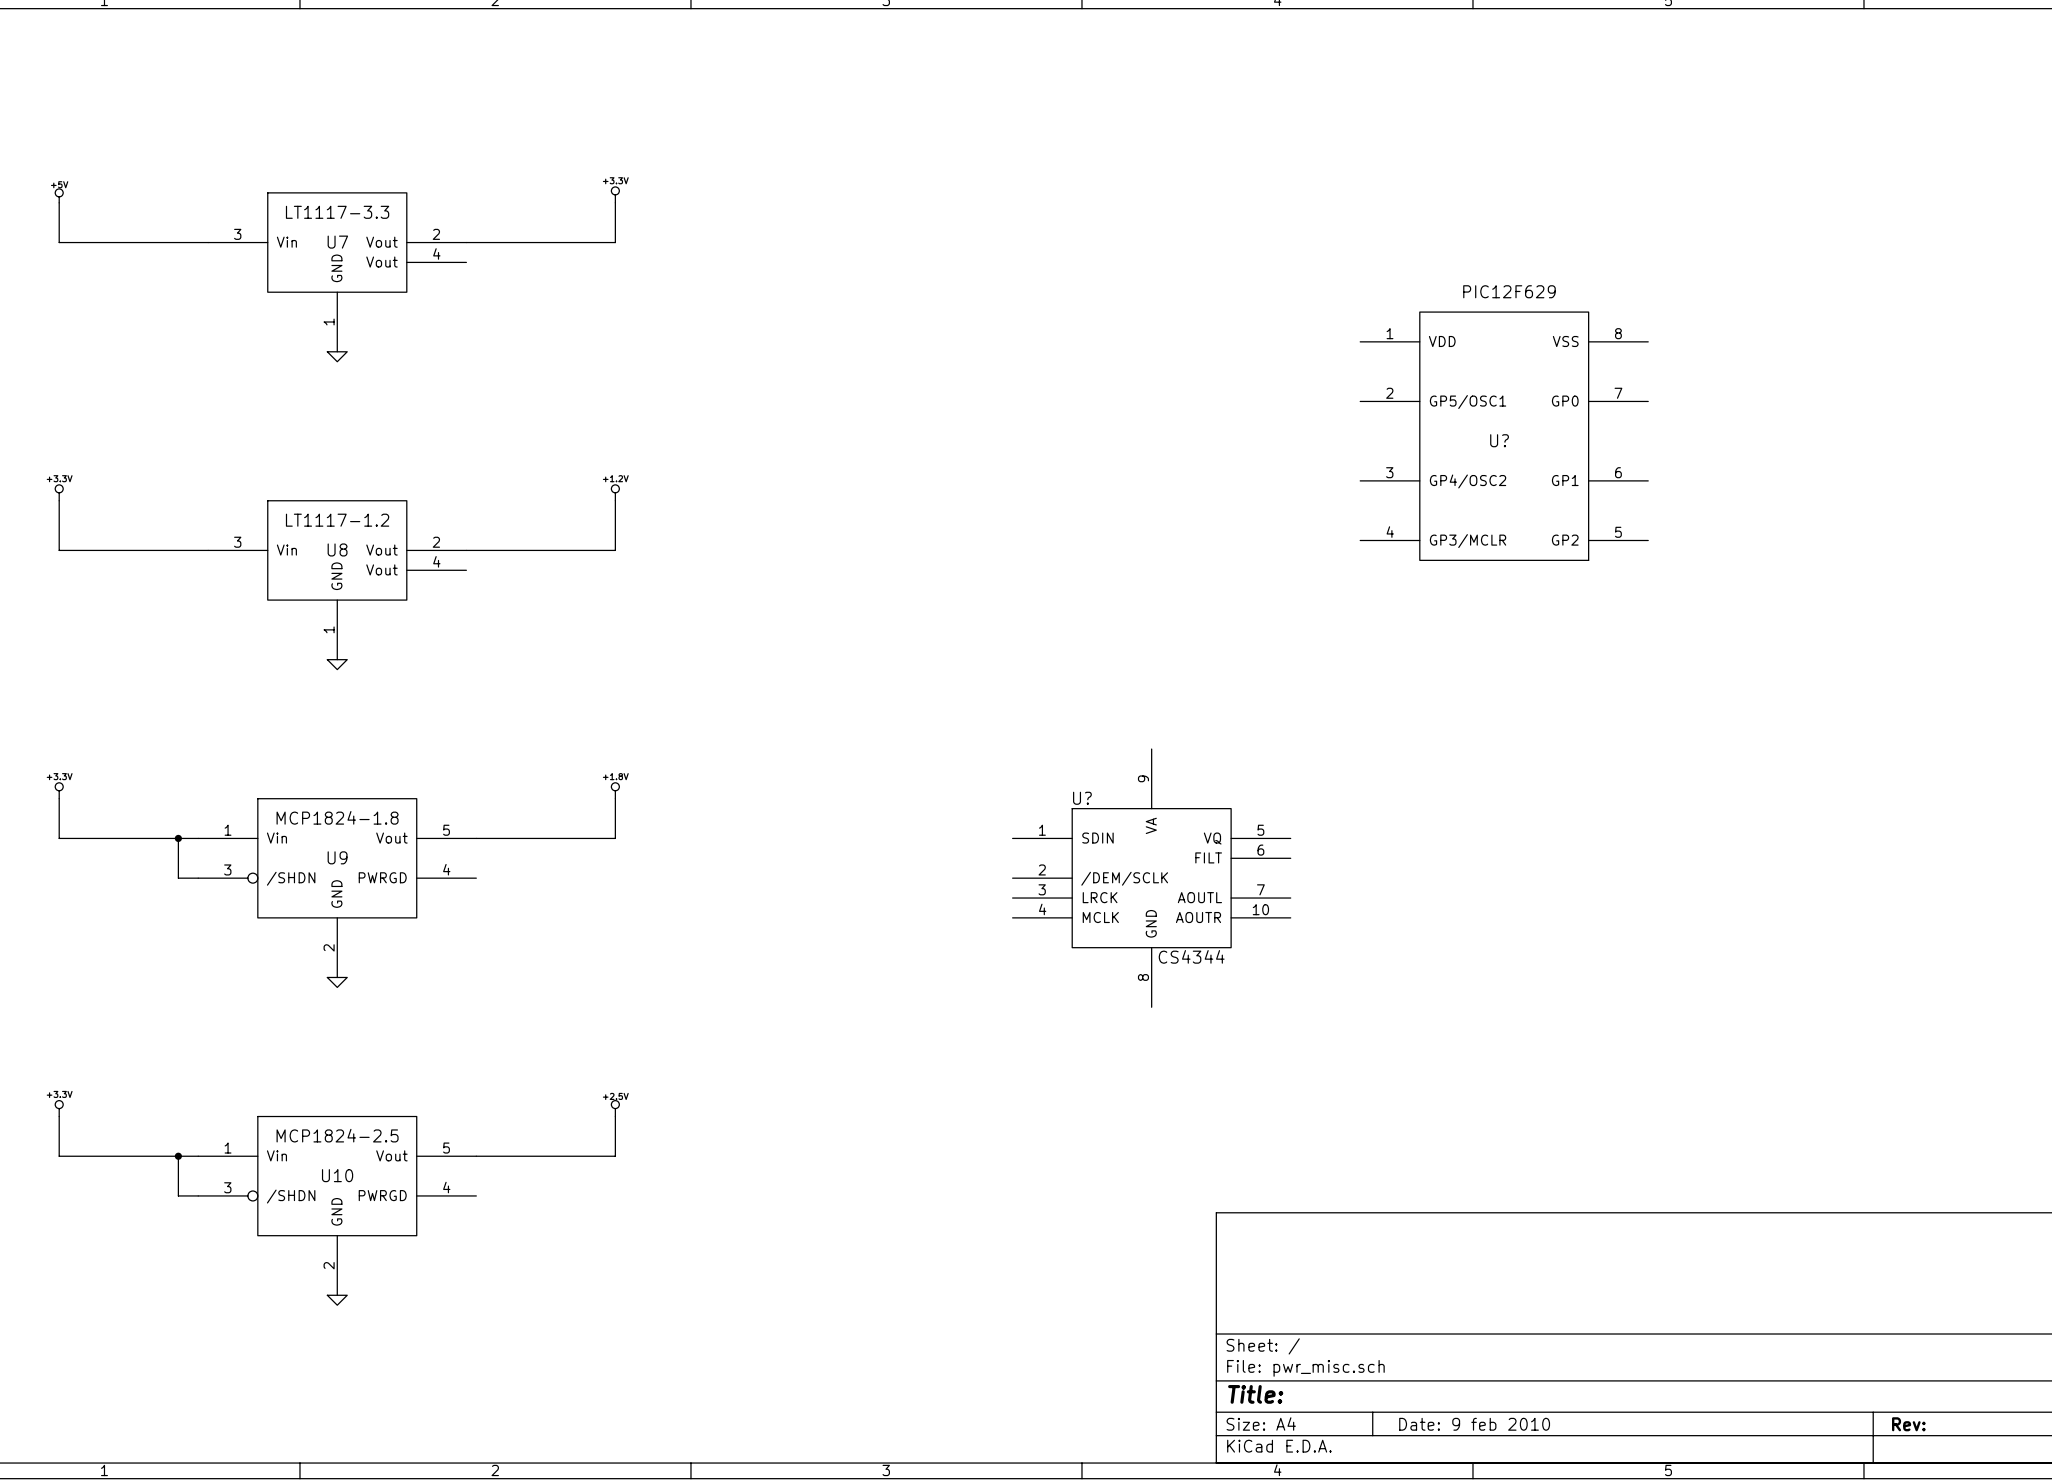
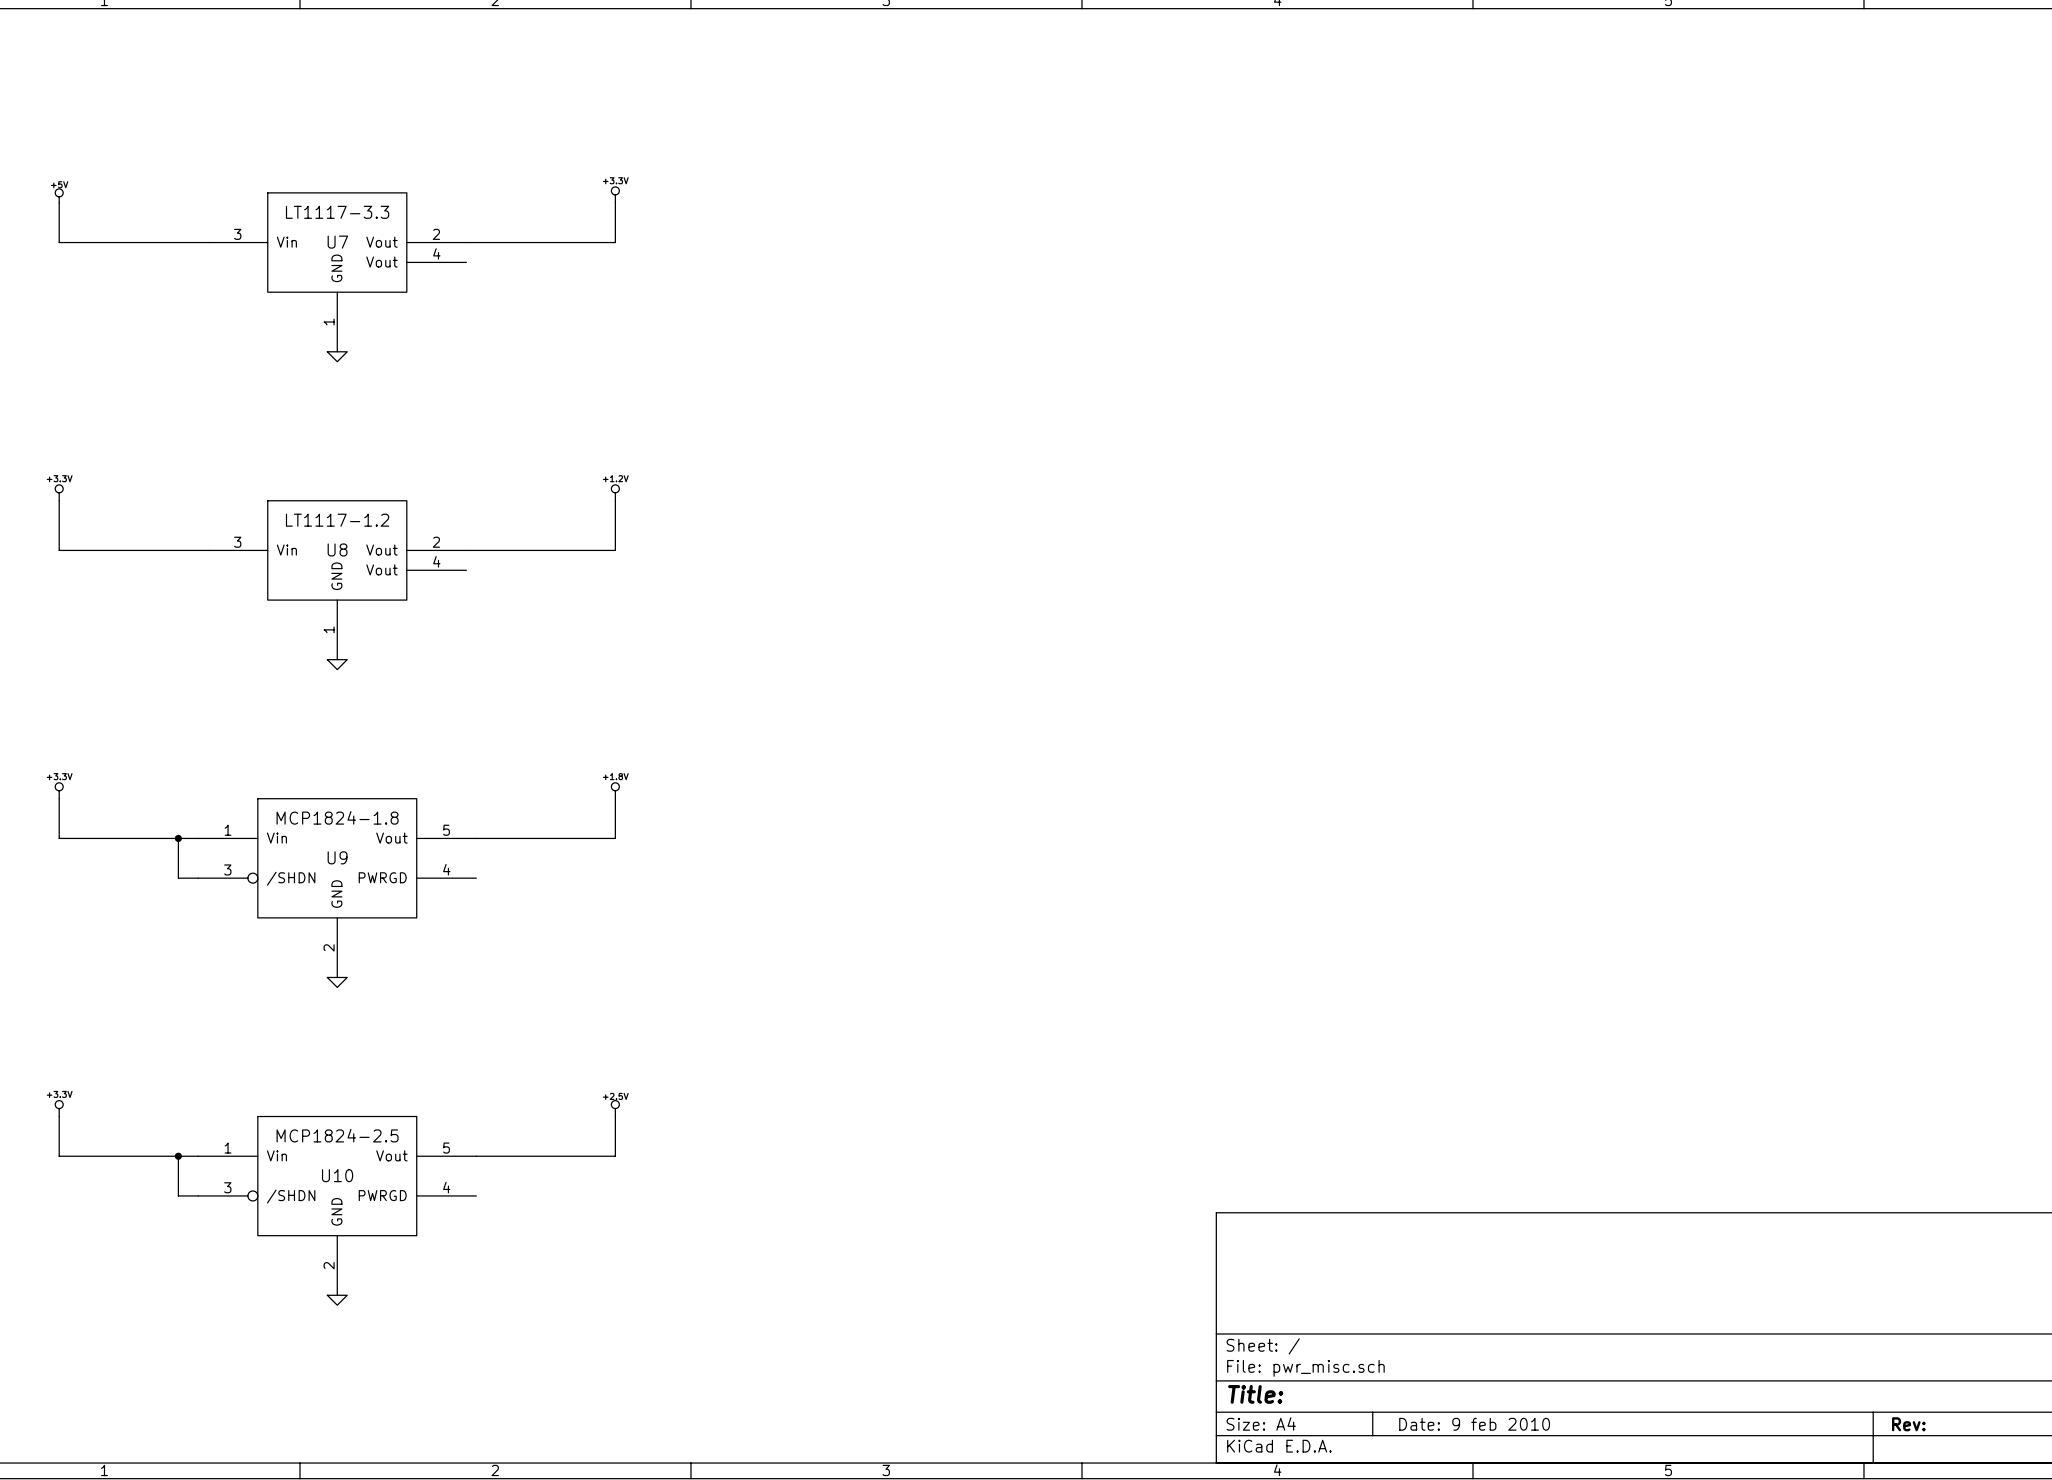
U?: PIC12F629 (1504, 436) -> none
U?: CS4344 (1151, 878) -> none

